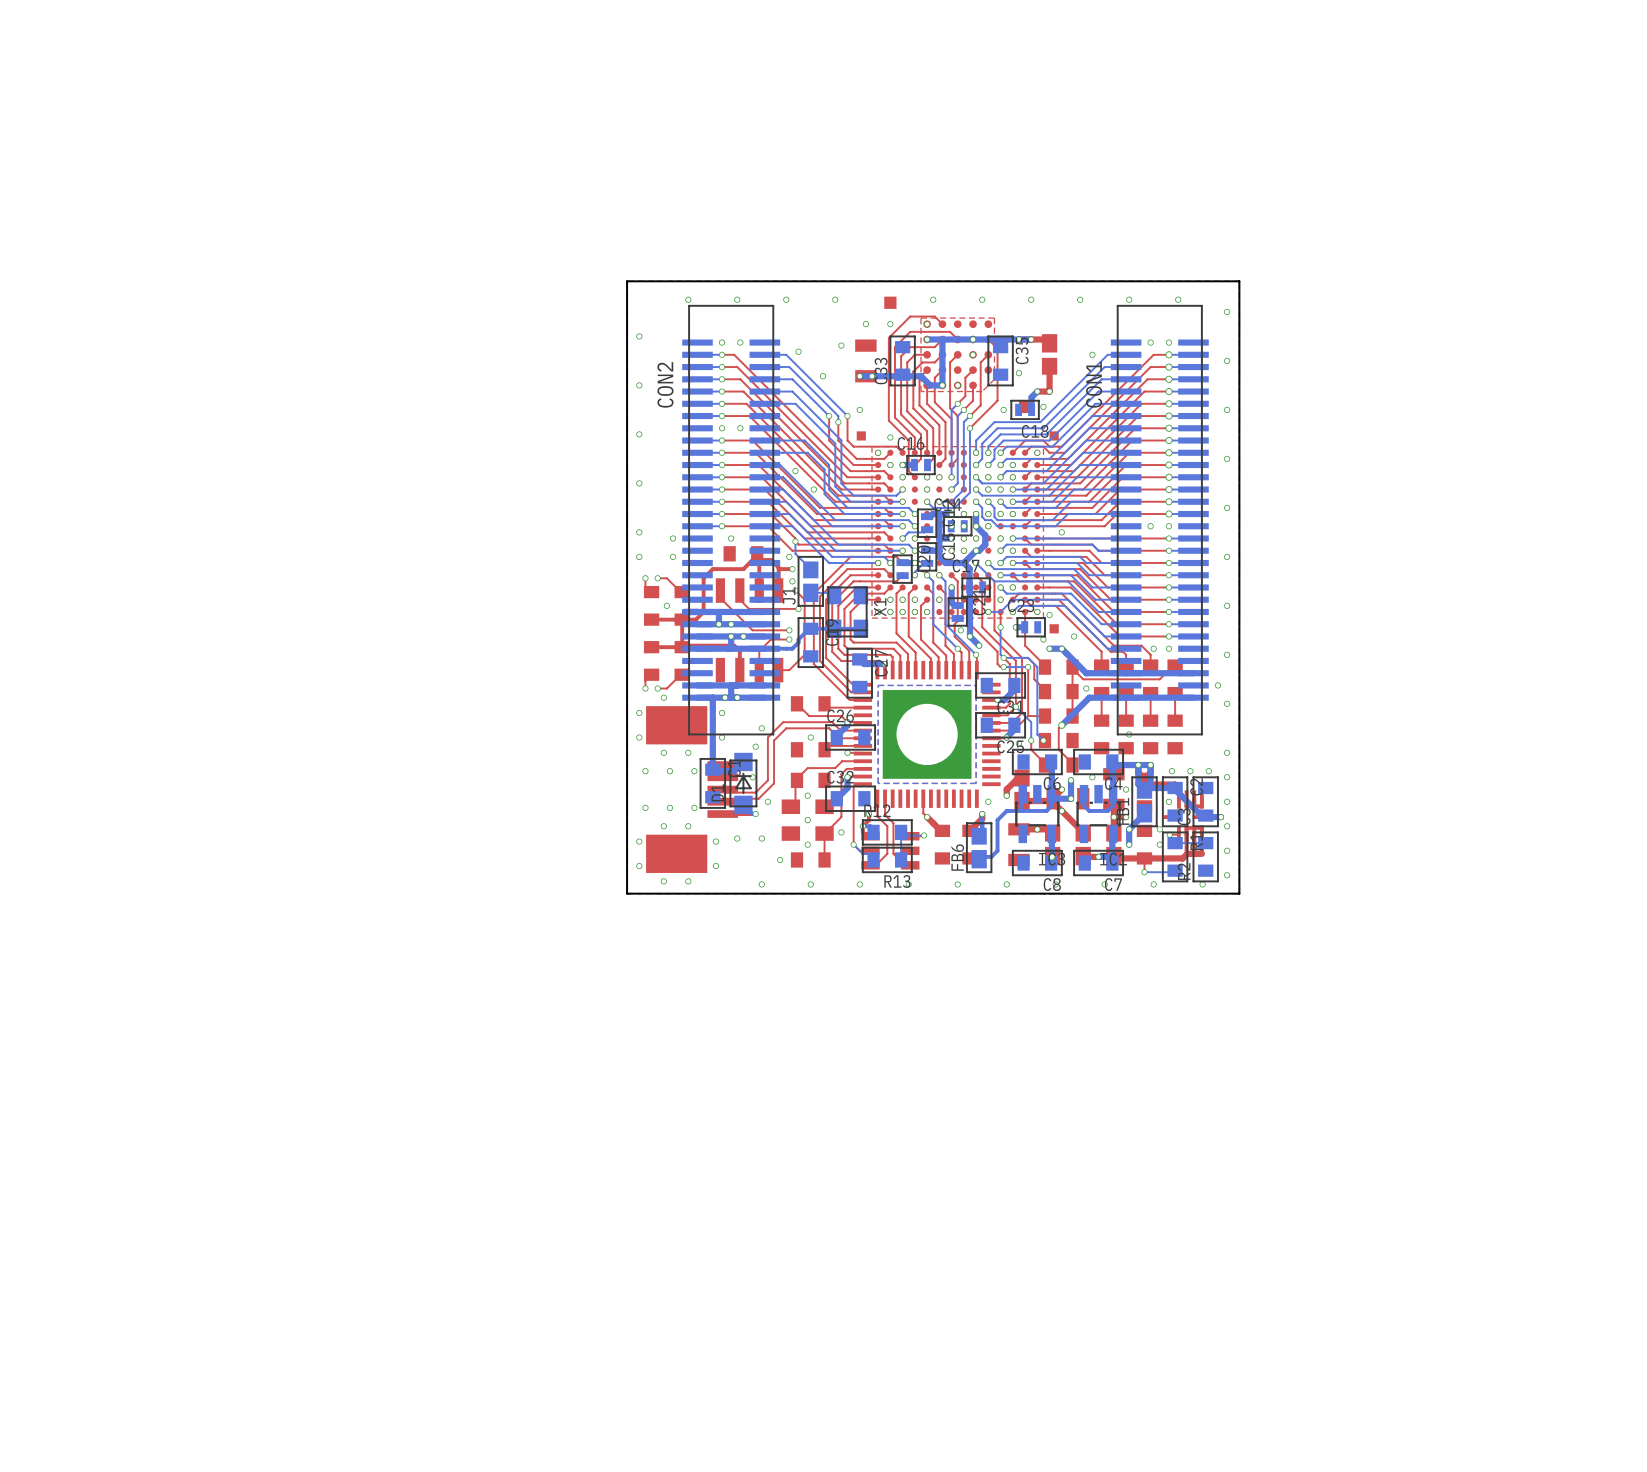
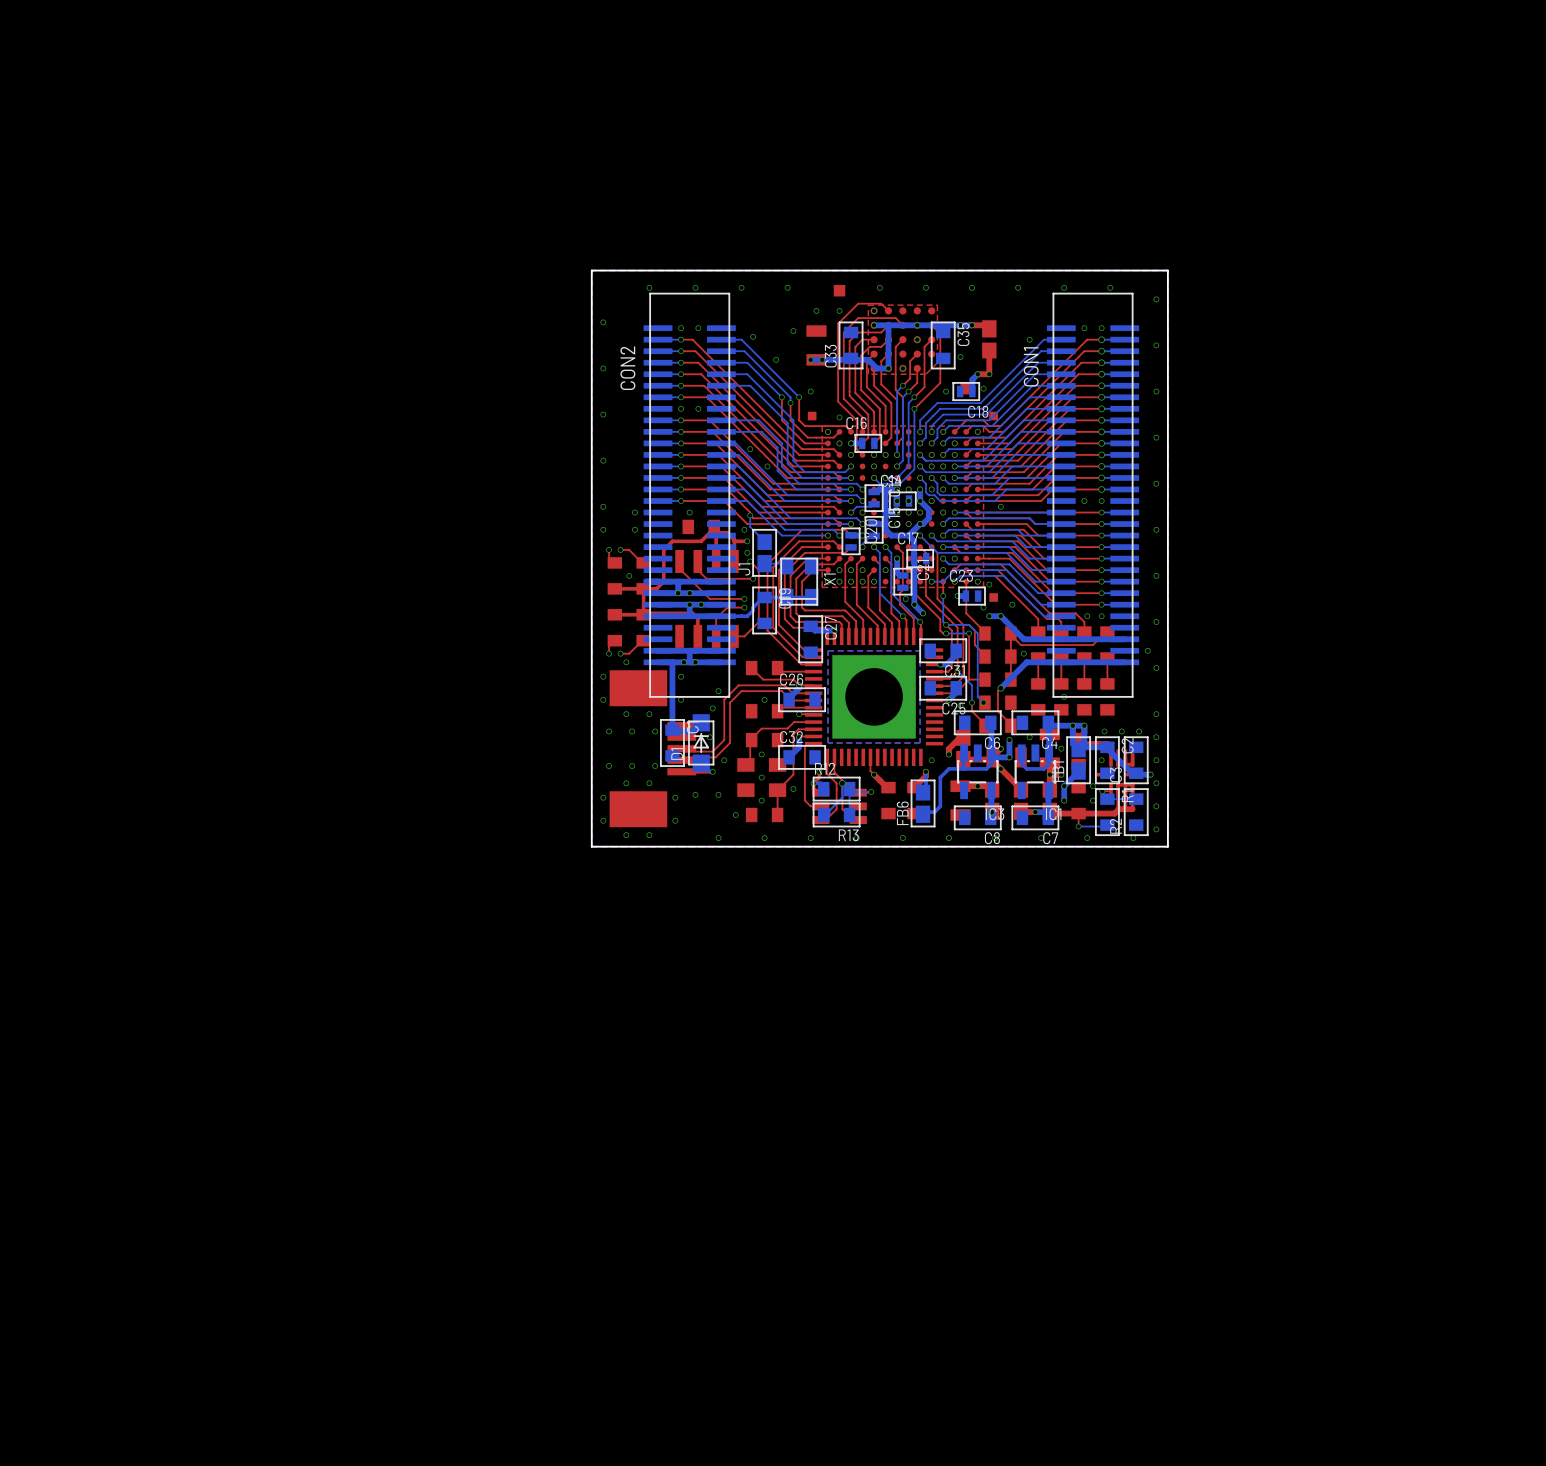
bottom track: none -> (842, 783) (842, 797) (829, 810) (829, 814)
via: none -> (842, 783)
bottom track: (853, 844) (862, 853) (870, 853) (873, 859) -> none
via: (853, 844) -> none

